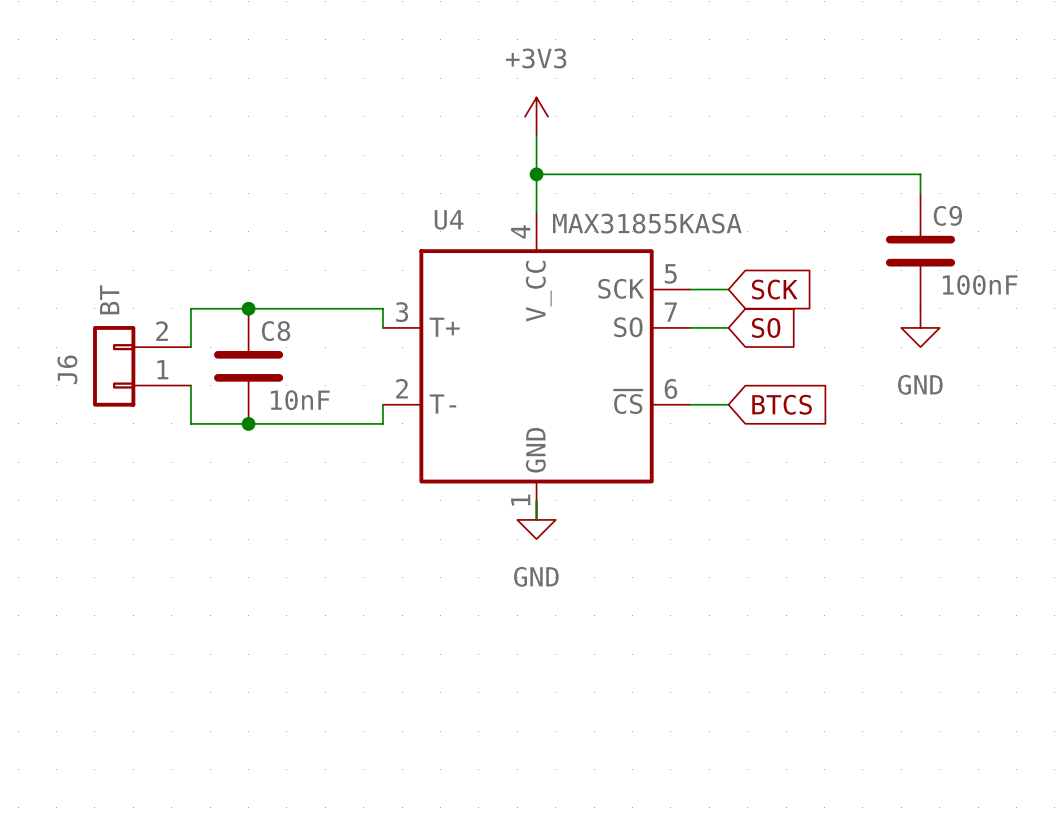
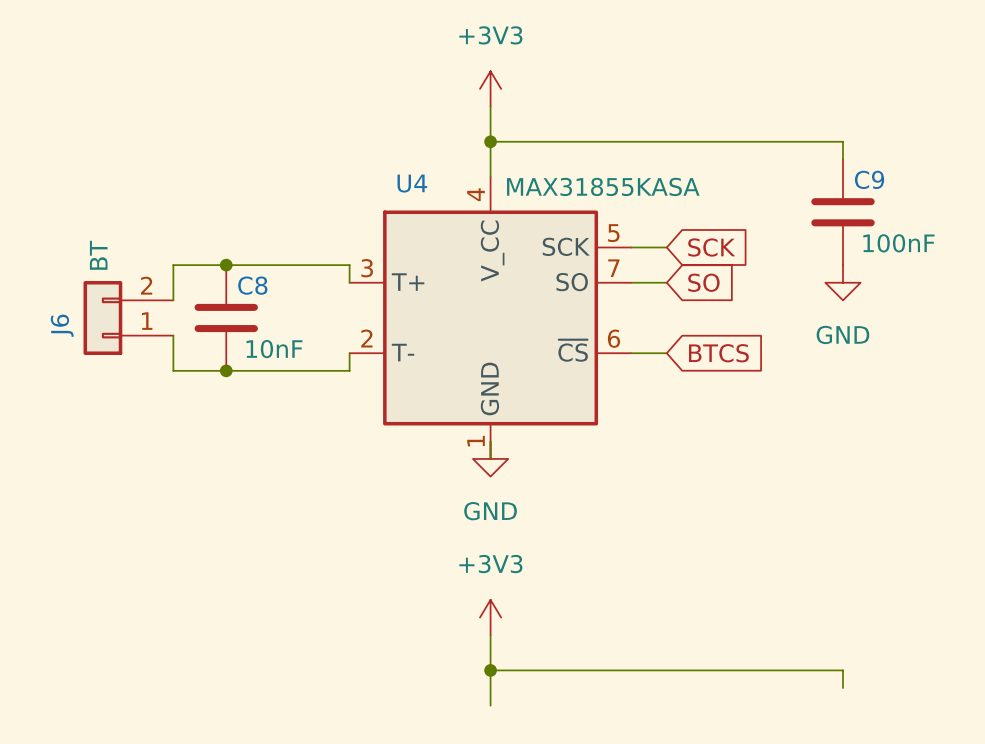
power symbol: none -> +3V3 (490, 617)
wire: none -> (490, 635) (490, 705)
wire: none -> (490, 670) (843, 670) (843, 688)
junction: none -> (490, 670)

